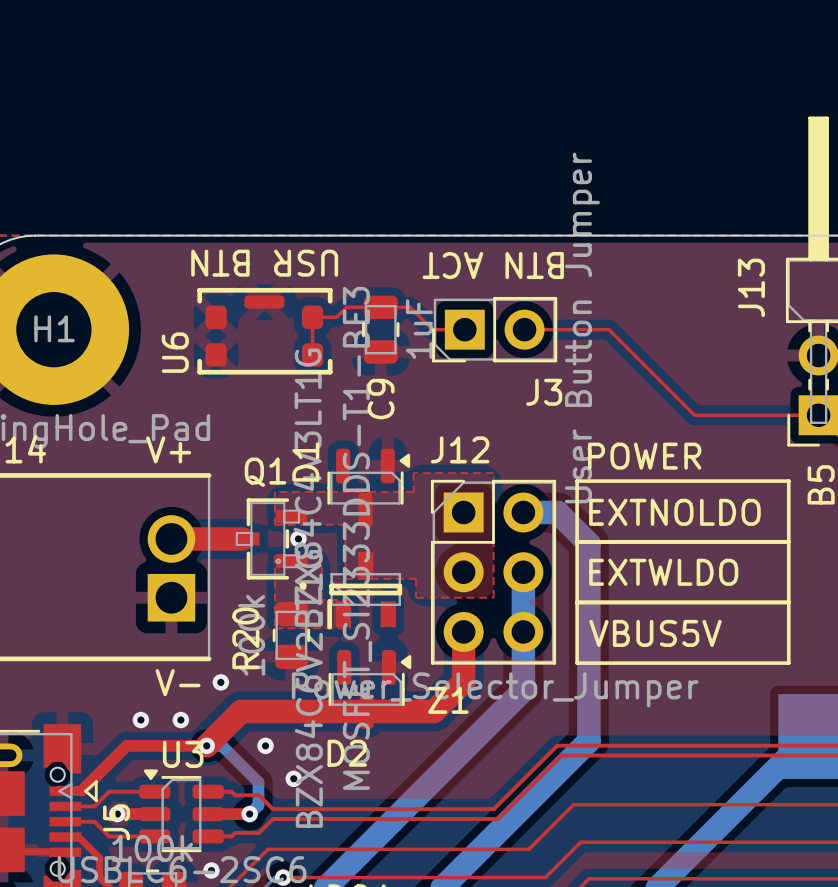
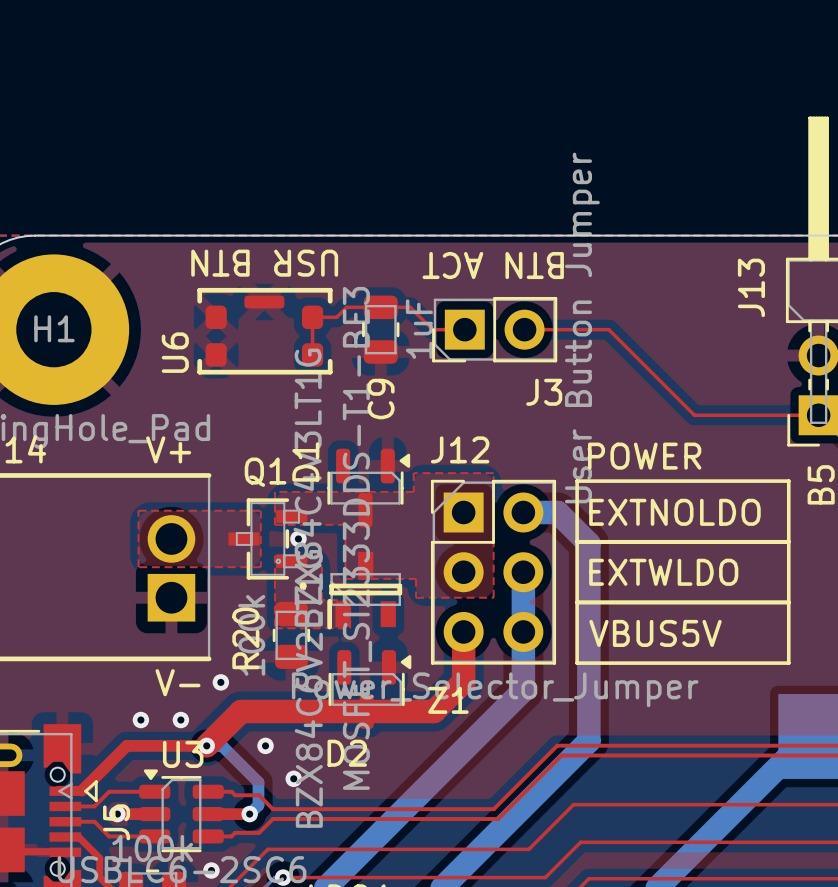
top zone outline: none -> (138, 510) (138, 567) (260, 567) (260, 510) (138, 510)
top track: (171, 538) (242, 538) -> none

